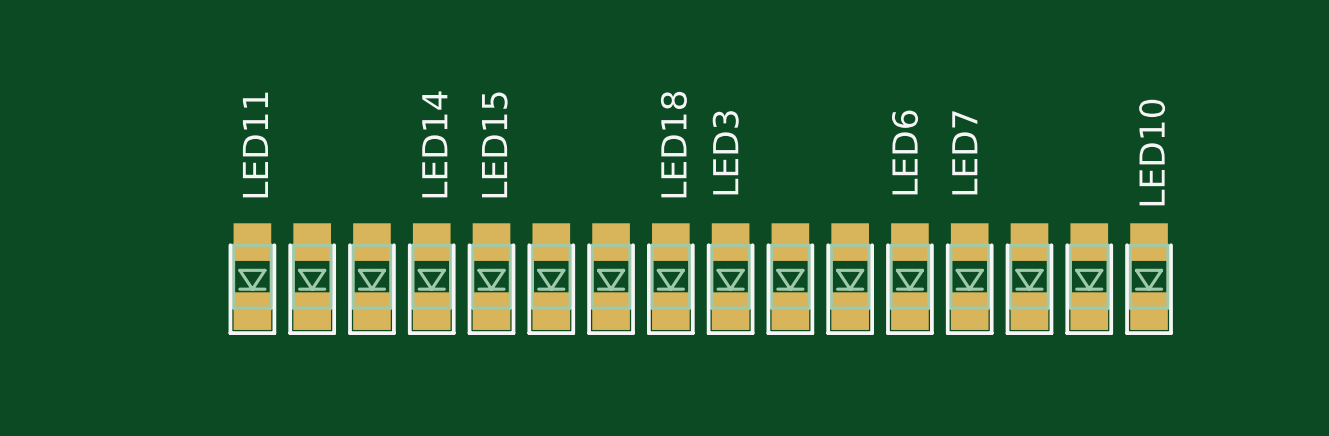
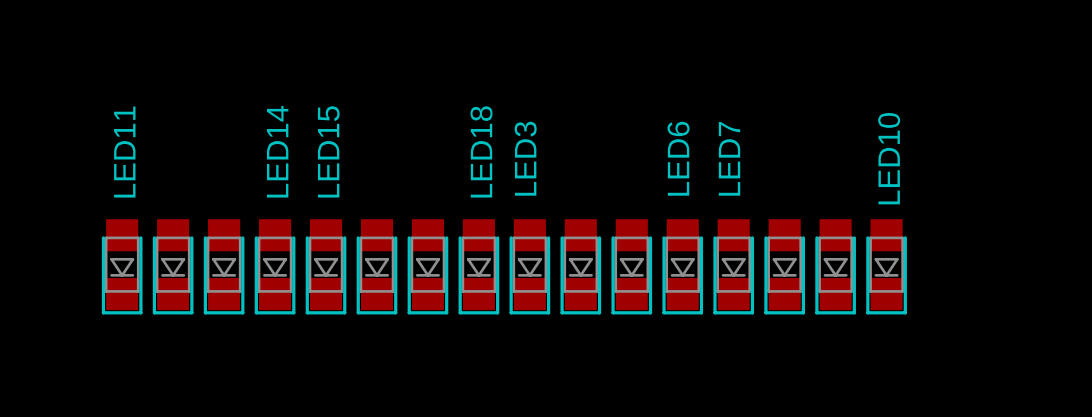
LED14 name: none -> LED14 (277, 151)
LED15 name: none -> LED15 (328, 151)
LED14 name: LED14 (434, 144) -> none
LED15 name: LED15 (494, 144) -> none
LED18 name: none -> LED18 (481, 151)
LED18 name: LED18 (673, 144) -> none
LED11 name: LED11 (255, 145) -> none
LED3 name: none -> LED3 (525, 158)
LED3 name: LED3 (725, 152) -> none
LED6 name: none -> LED6 (678, 158)
LED7 name: none -> LED7 (729, 158)
LED6 name: LED6 (905, 152) -> none
LED7 name: LED7 (964, 152) -> none
LED10 name: none -> LED10 (889, 158)
LED11: none -> (122, 266)
part: none -> (173, 266)
part: (1089, 279) -> none
LED10: (1149, 279) -> none

